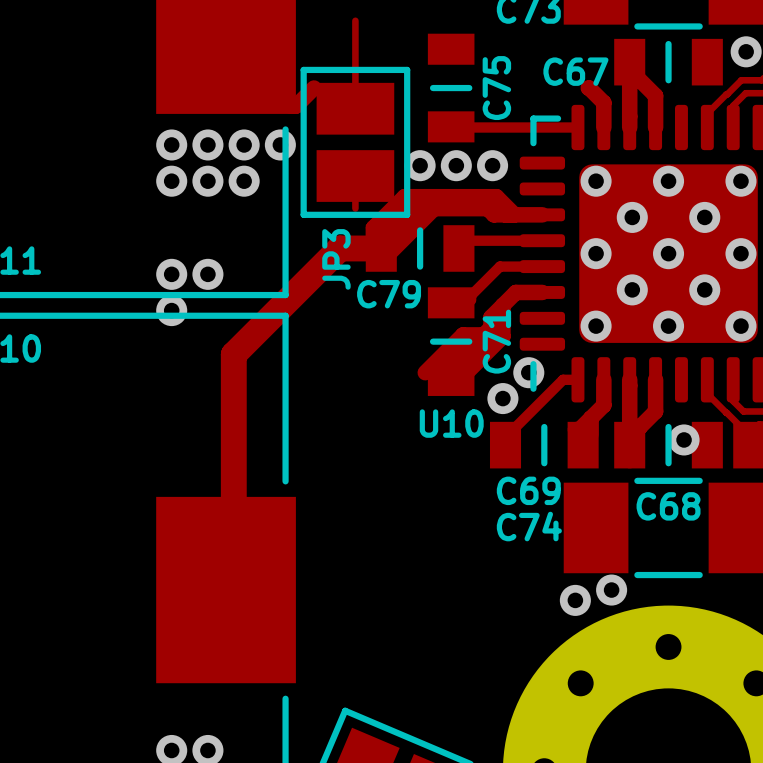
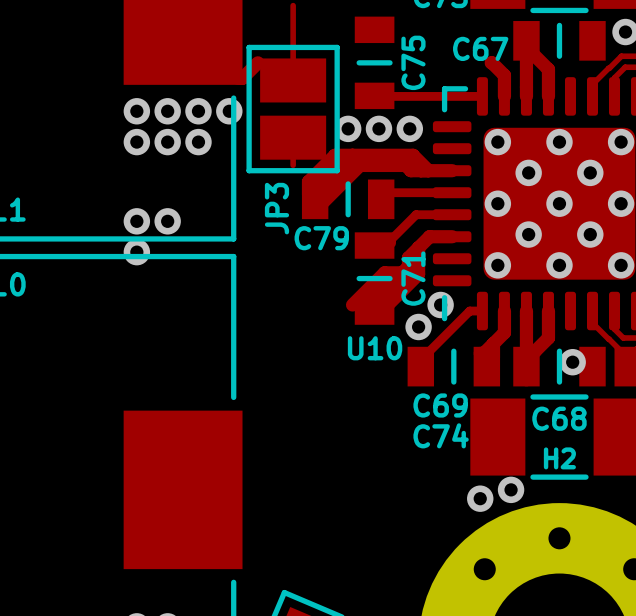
track: (381, 248) (339, 248) (233, 354) (233, 590) -> none
H2 name: none -> H2 (559, 458)

